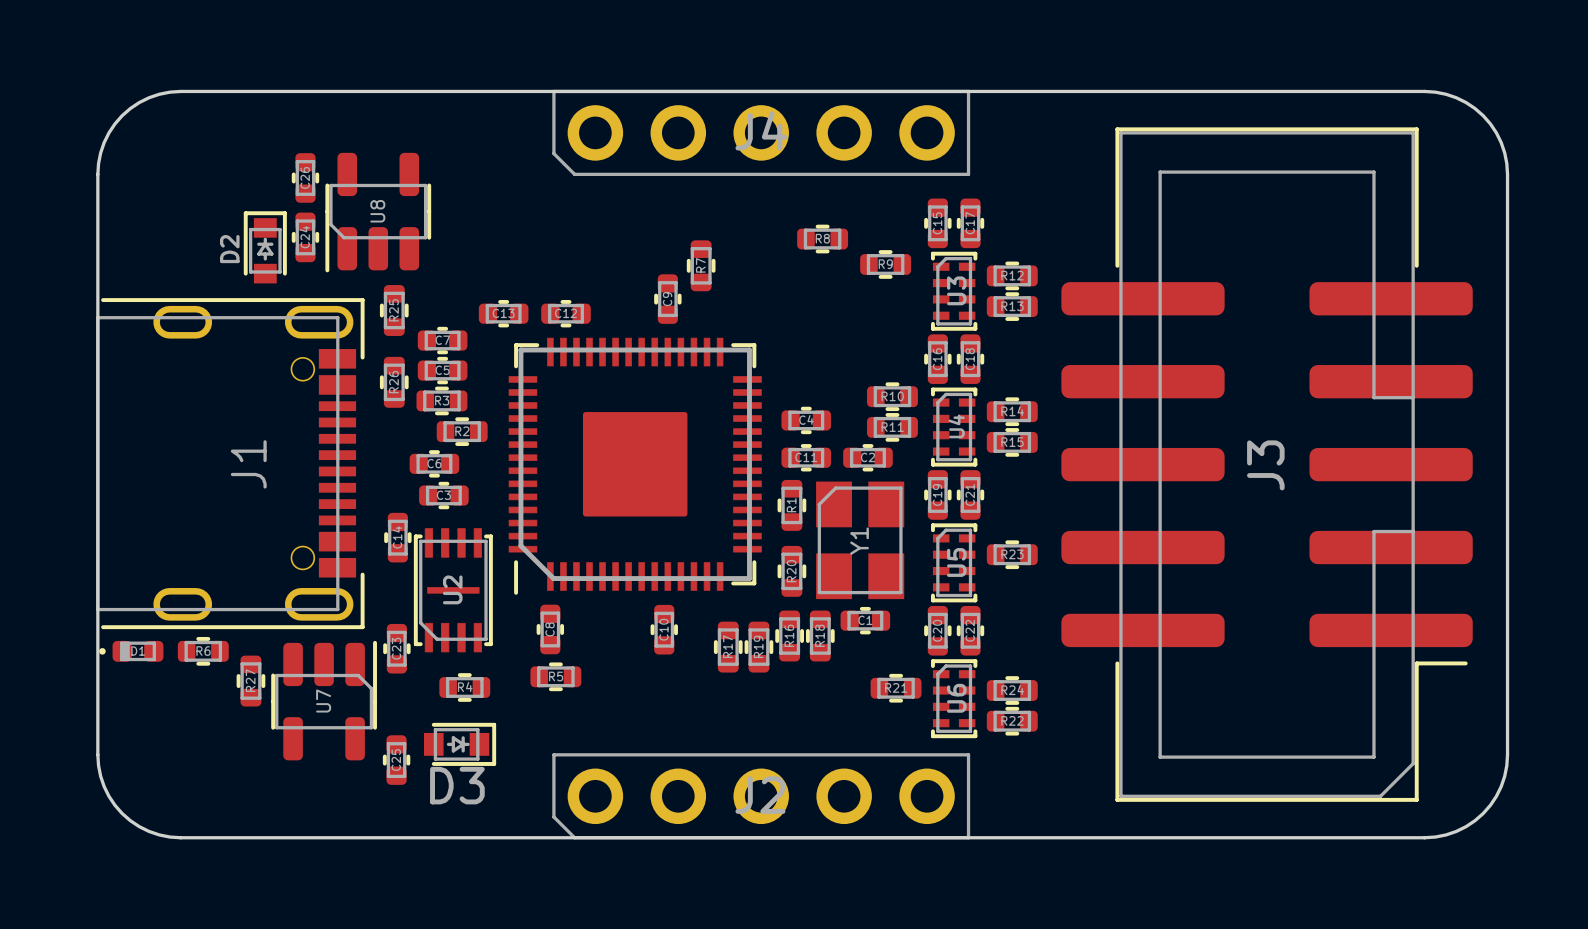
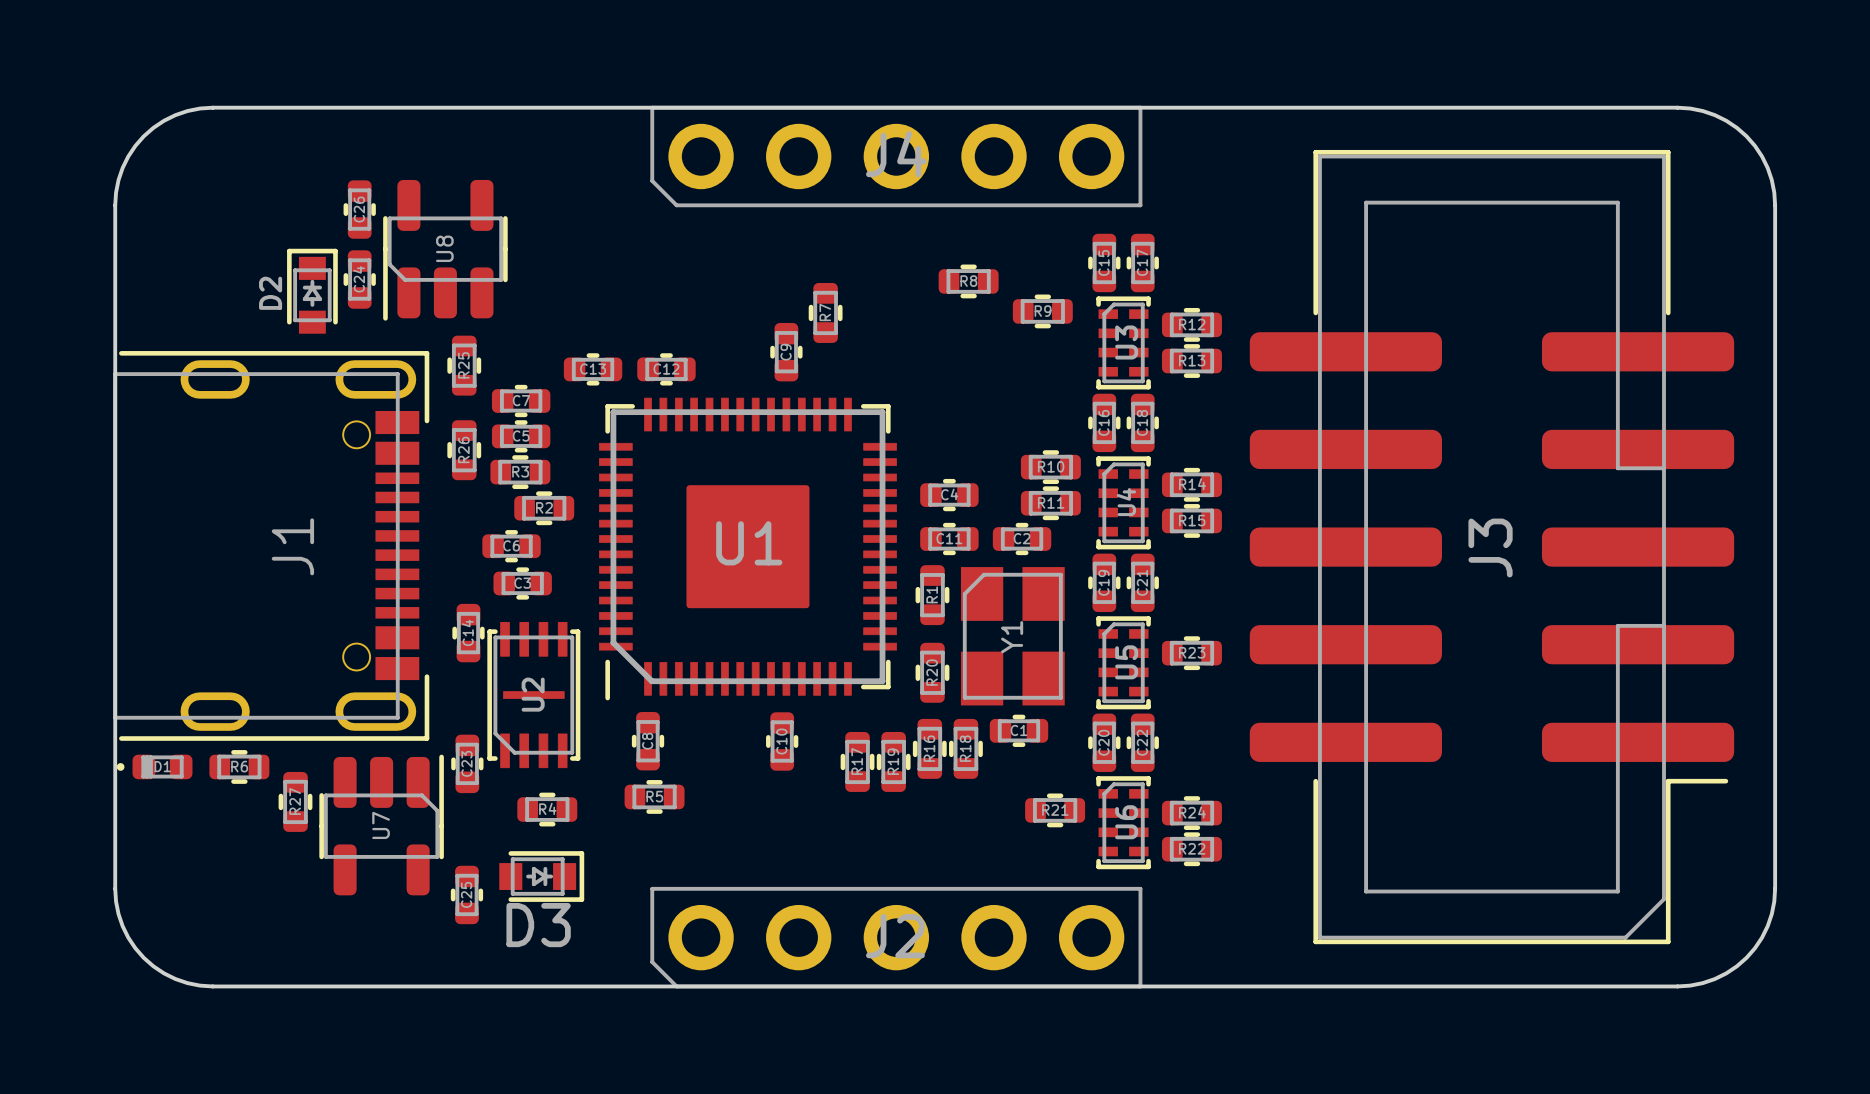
U1 name: none -> U1 (749, 543)

